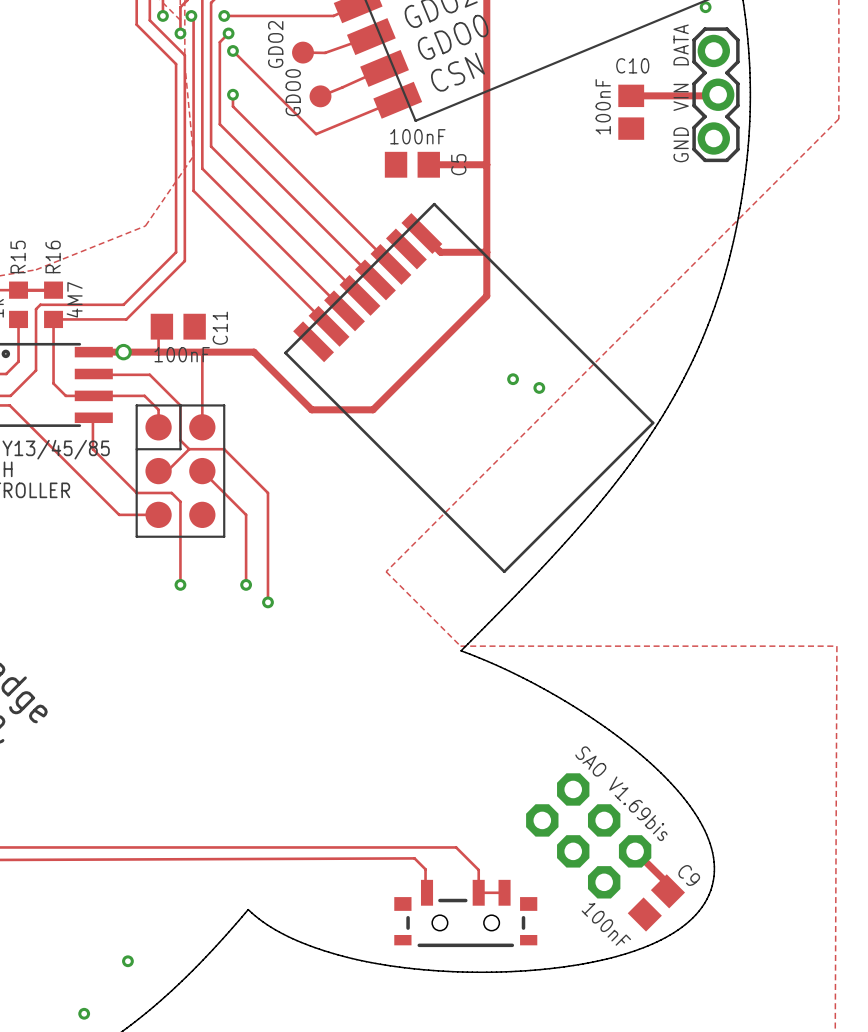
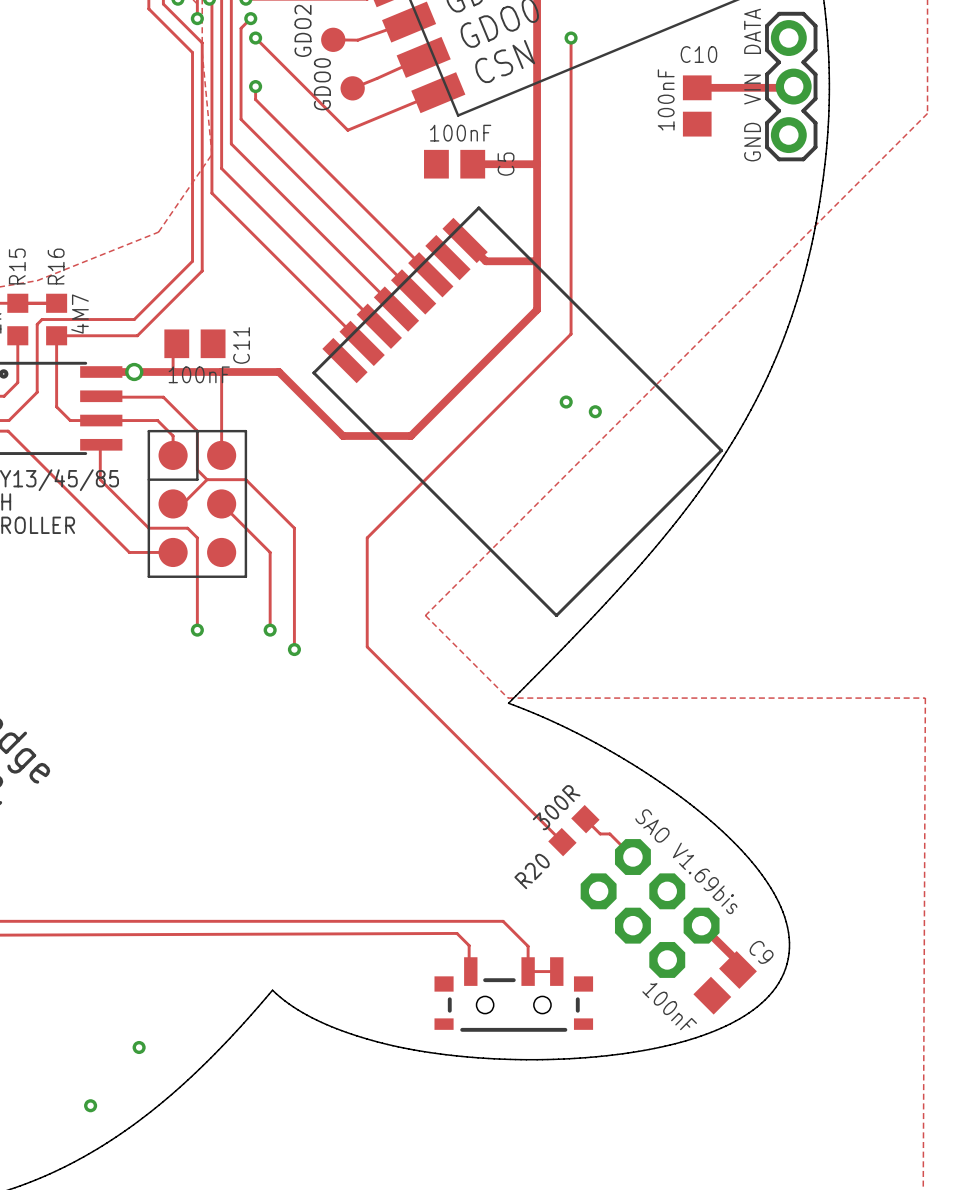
track: none -> (571, 38) (571, 334) (367, 537) (367, 646) (562, 842)
via: none -> (571, 38)
track: none -> (585, 819) (600, 833) (609, 833) (632, 857)
R20: none -> 300R (573, 830)

